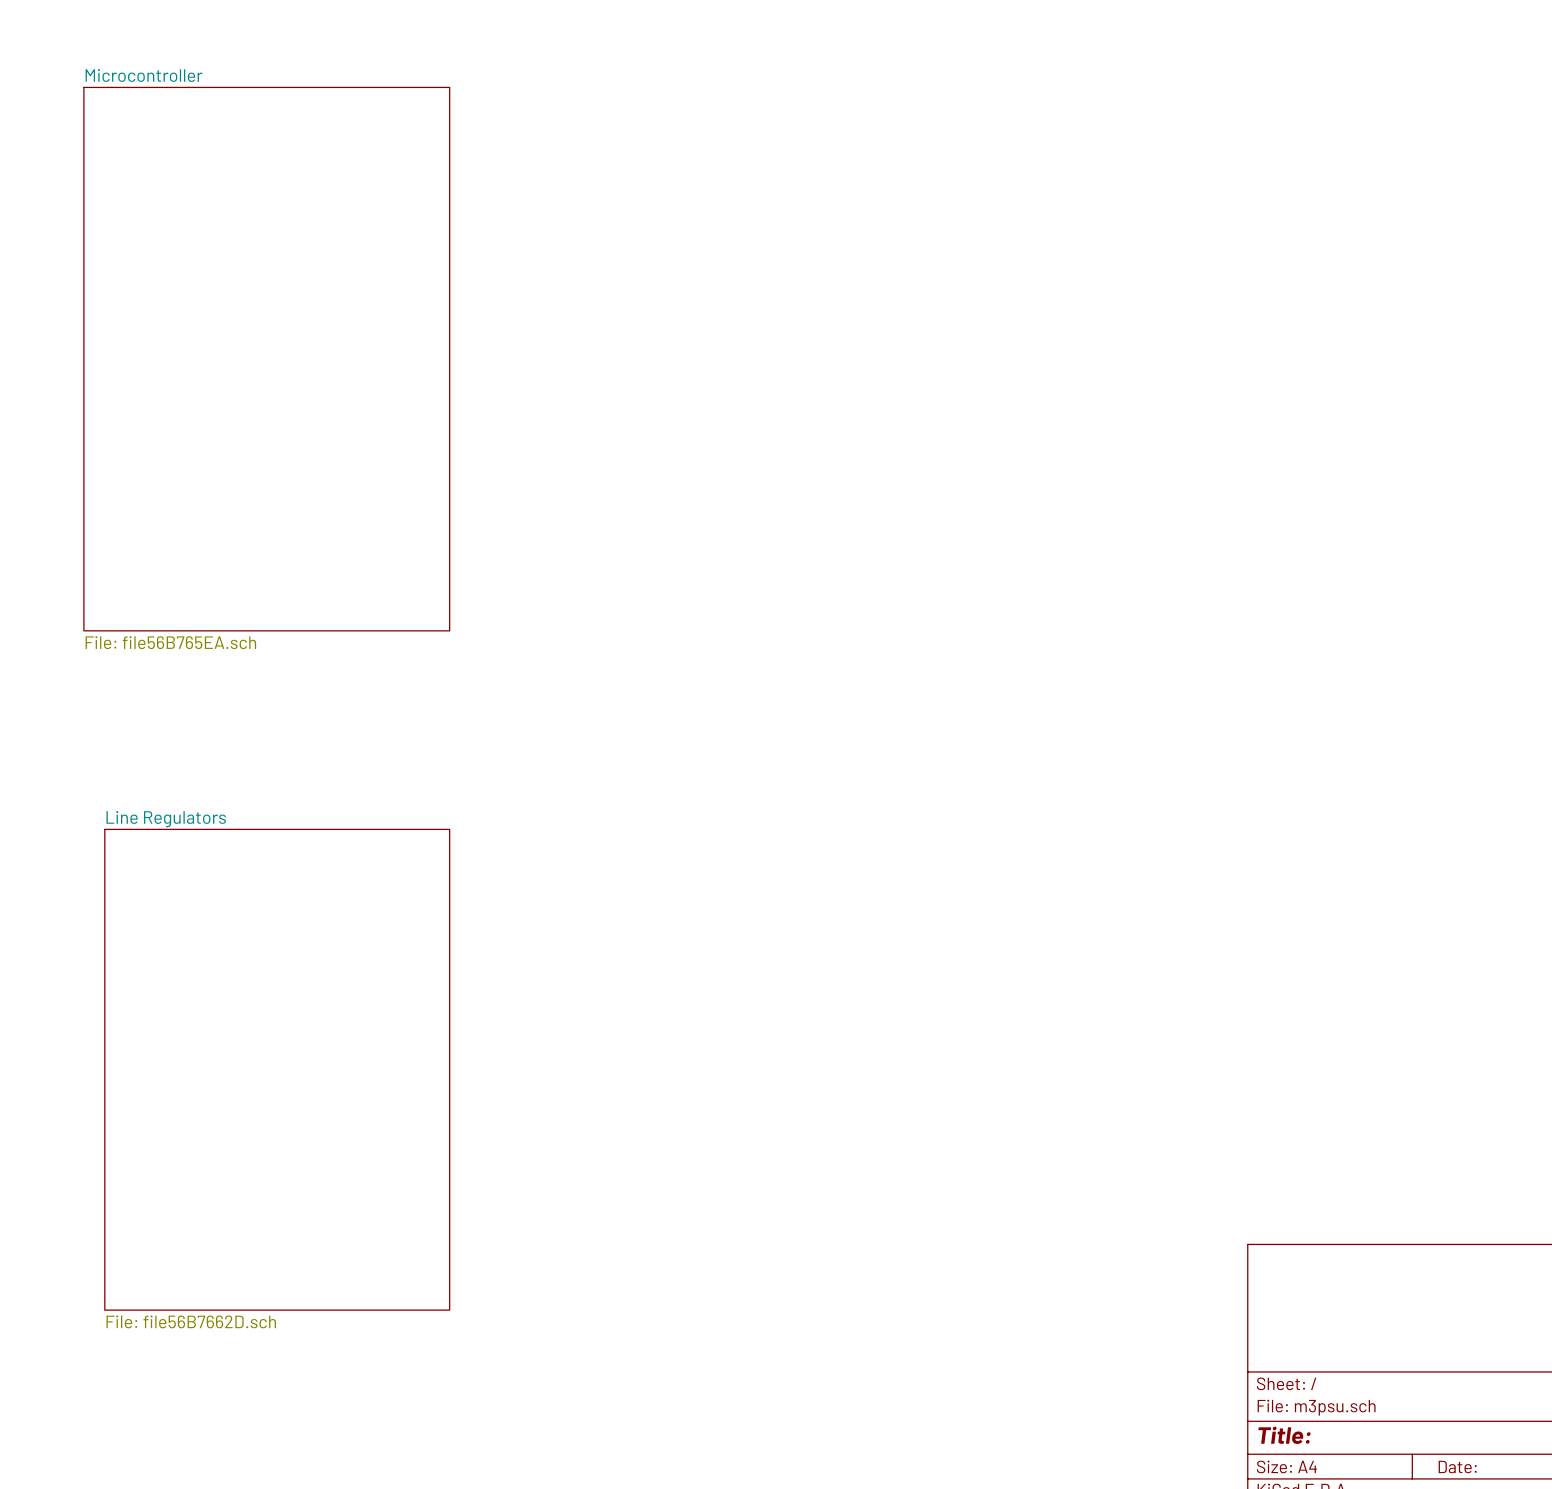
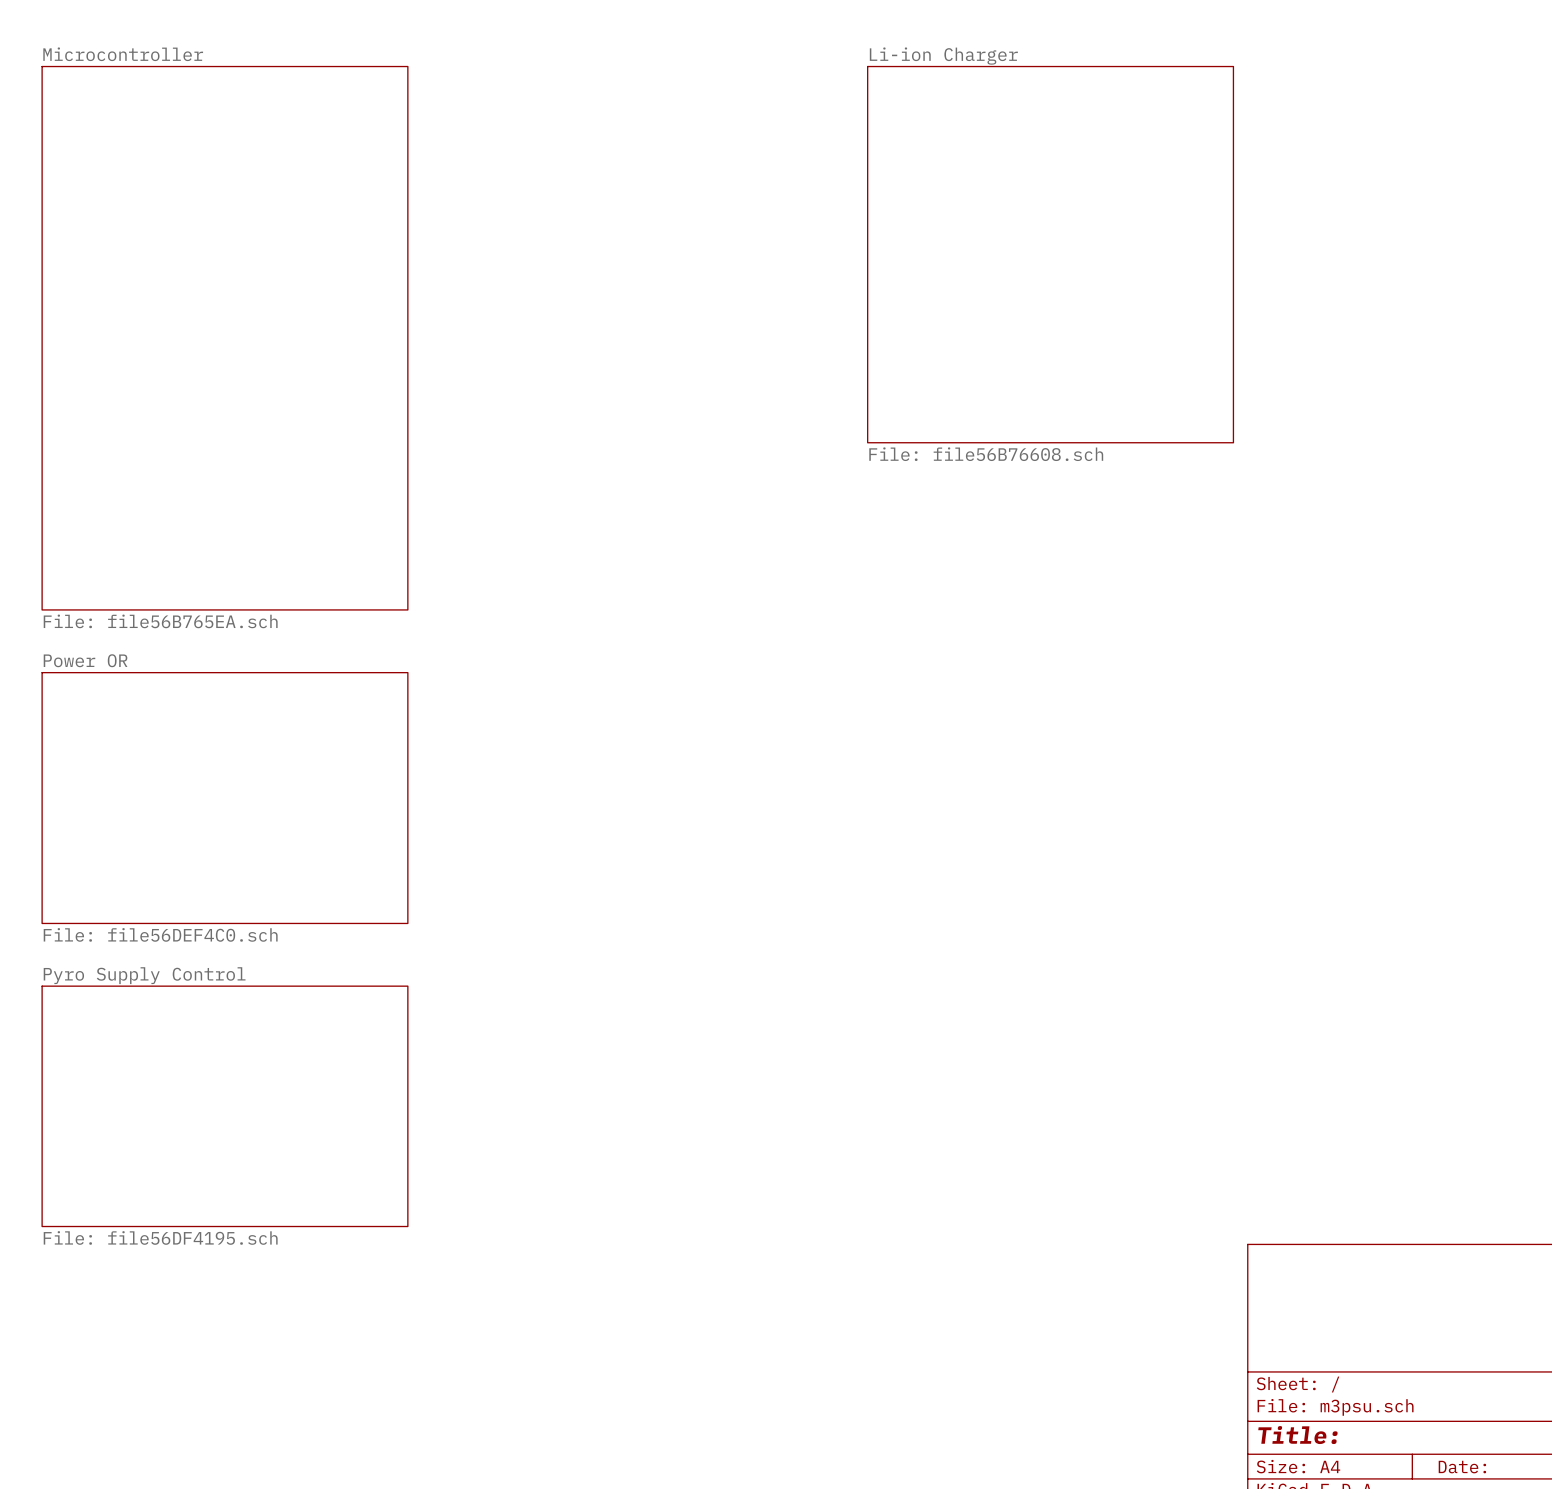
sheet Li-ion Charger: none -> File: file56B76608.sch (1050, 254)
sheet Microcontroller position: (266, 359) -> (224, 338)
sheet Power OR: none -> File: file56DEF4C0.sch (224, 798)
sheet Line Regulators: File: file56B7662D.sch (277, 1069) -> none
sheet Pyro Supply Control: none -> File: file56DF4195.sch (224, 1106)

